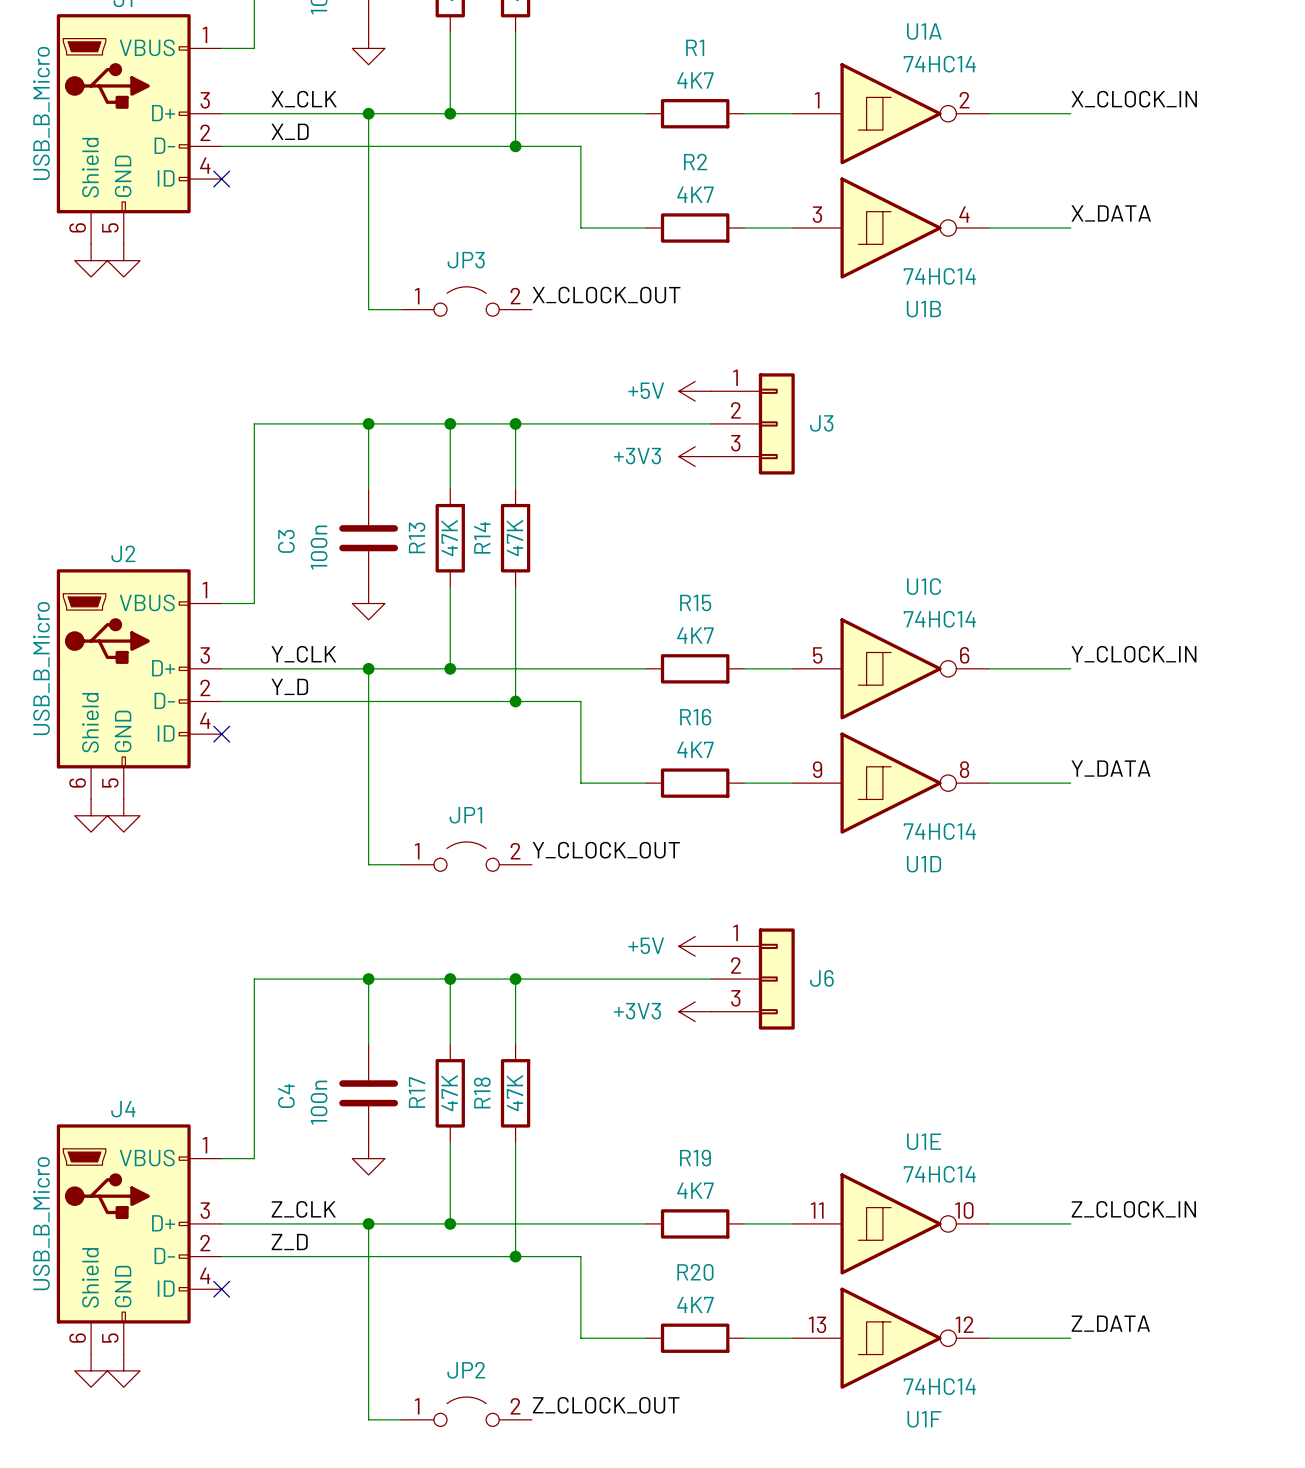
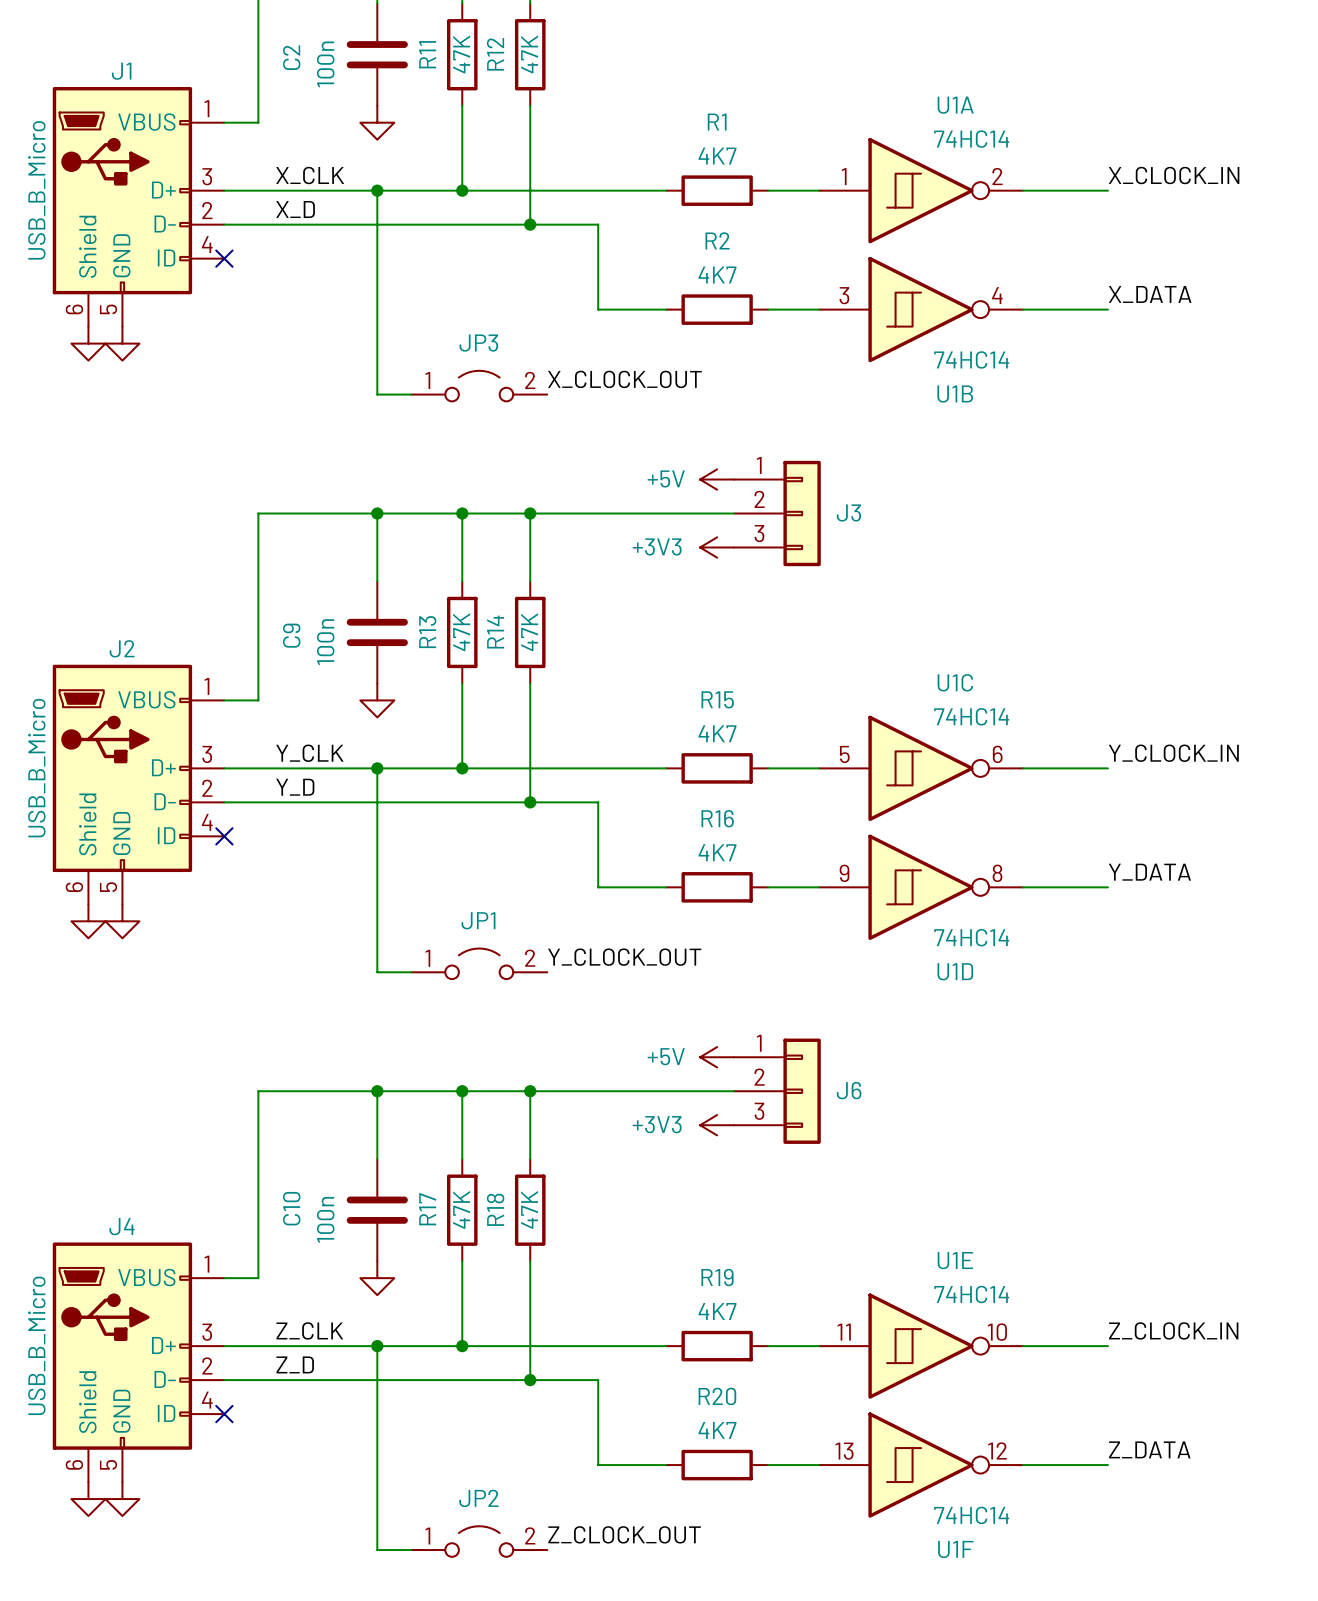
C3 name: C3 (286, 541) -> C9 (291, 635)
C4 name: C4 (286, 1096) -> C10 (291, 1208)

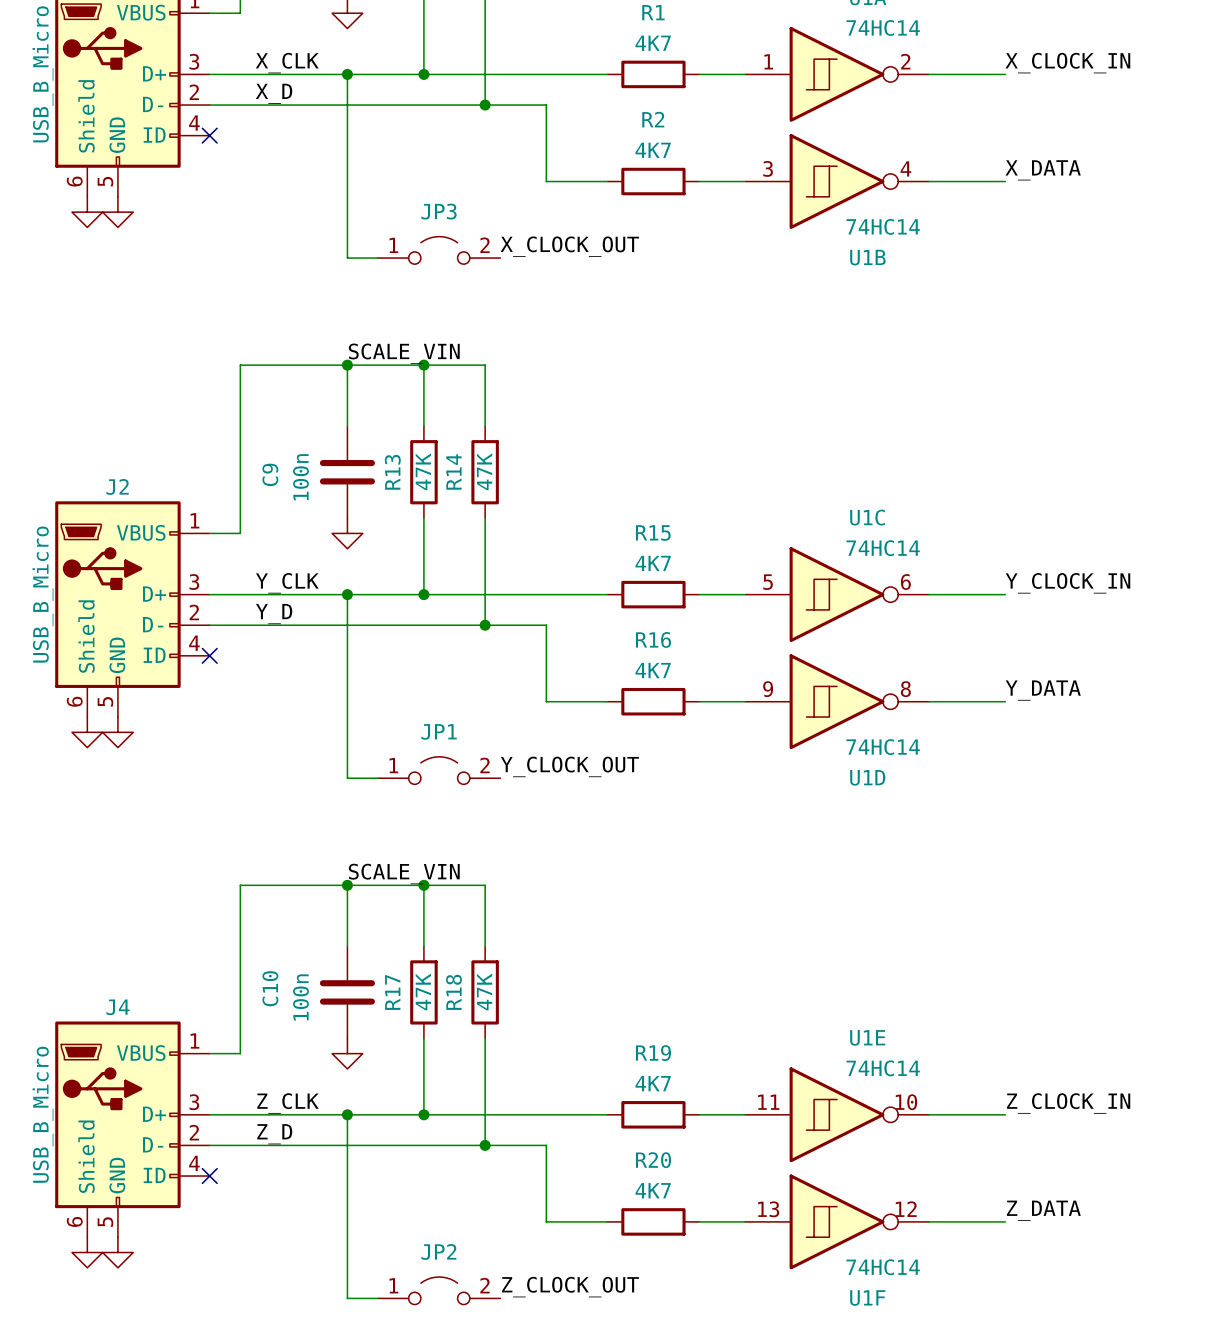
power symbol: +5V (717, 479) -> none
label: none -> SCALE_VIN (404, 353)
wire: (530, 513) (734, 513) -> none
junction: (530, 513) -> none
J3: (777, 513) -> none
power symbol: +3V3 (717, 547) -> none
power symbol: +5V (717, 1057) -> none
label: none -> SCALE_VIN (404, 874)
wire: (530, 1091) (734, 1091) -> none
junction: (530, 1091) -> none
J6: (777, 1091) -> none
power symbol: +3V3 (717, 1125) -> none

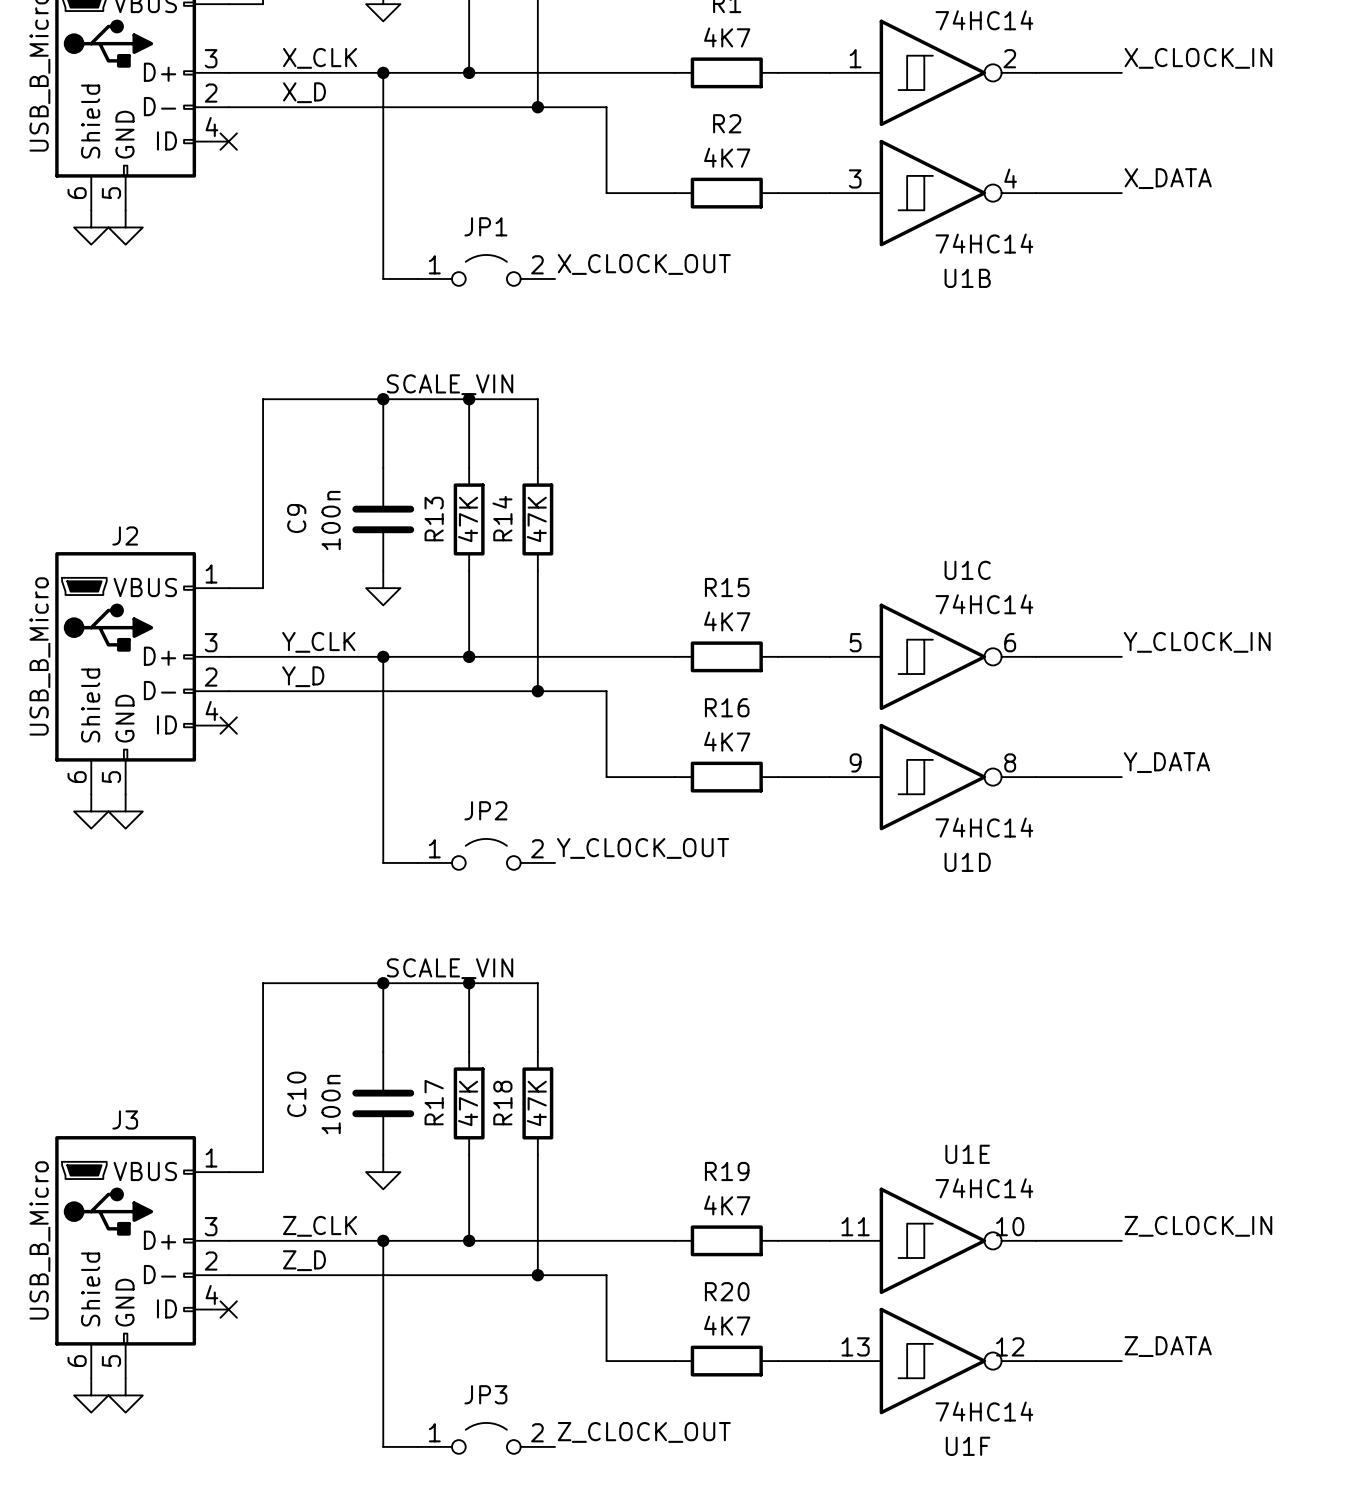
JP3 name: JP3 (439, 211) -> JP1 (485, 226)
JP1 name: JP1 (439, 731) -> JP2 (485, 810)
J4 name: J4 (117, 1007) -> J3 (125, 1119)
JP2 name: JP2 (438, 1251) -> JP3 (485, 1394)

